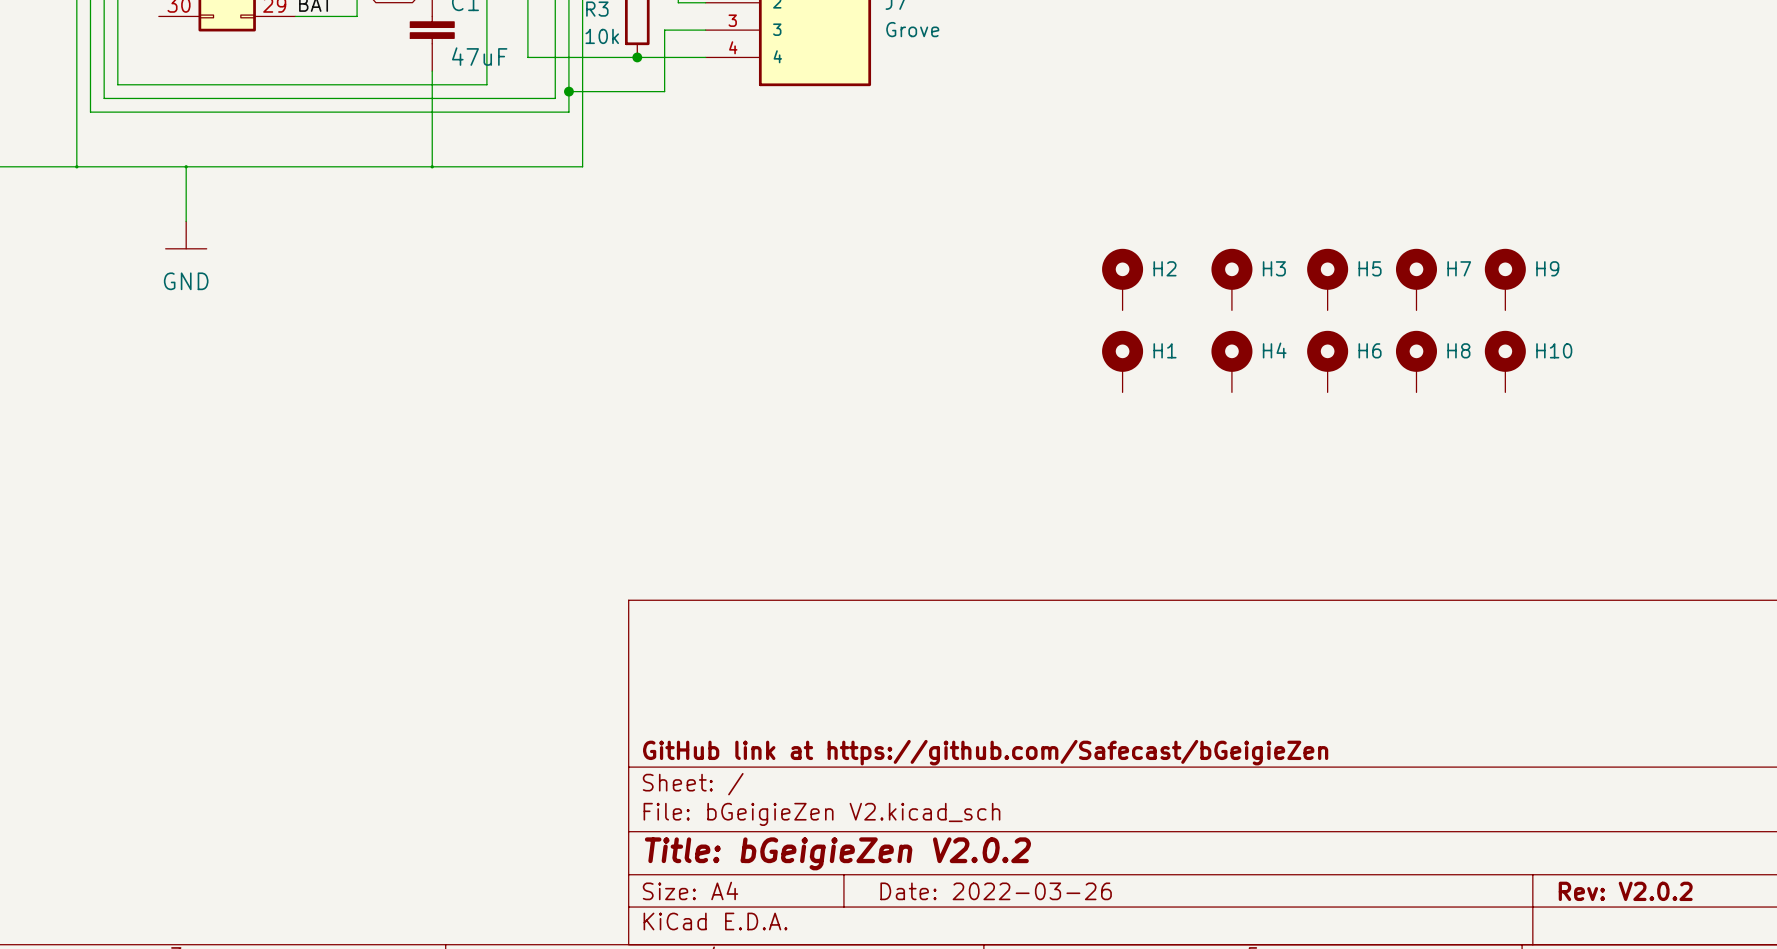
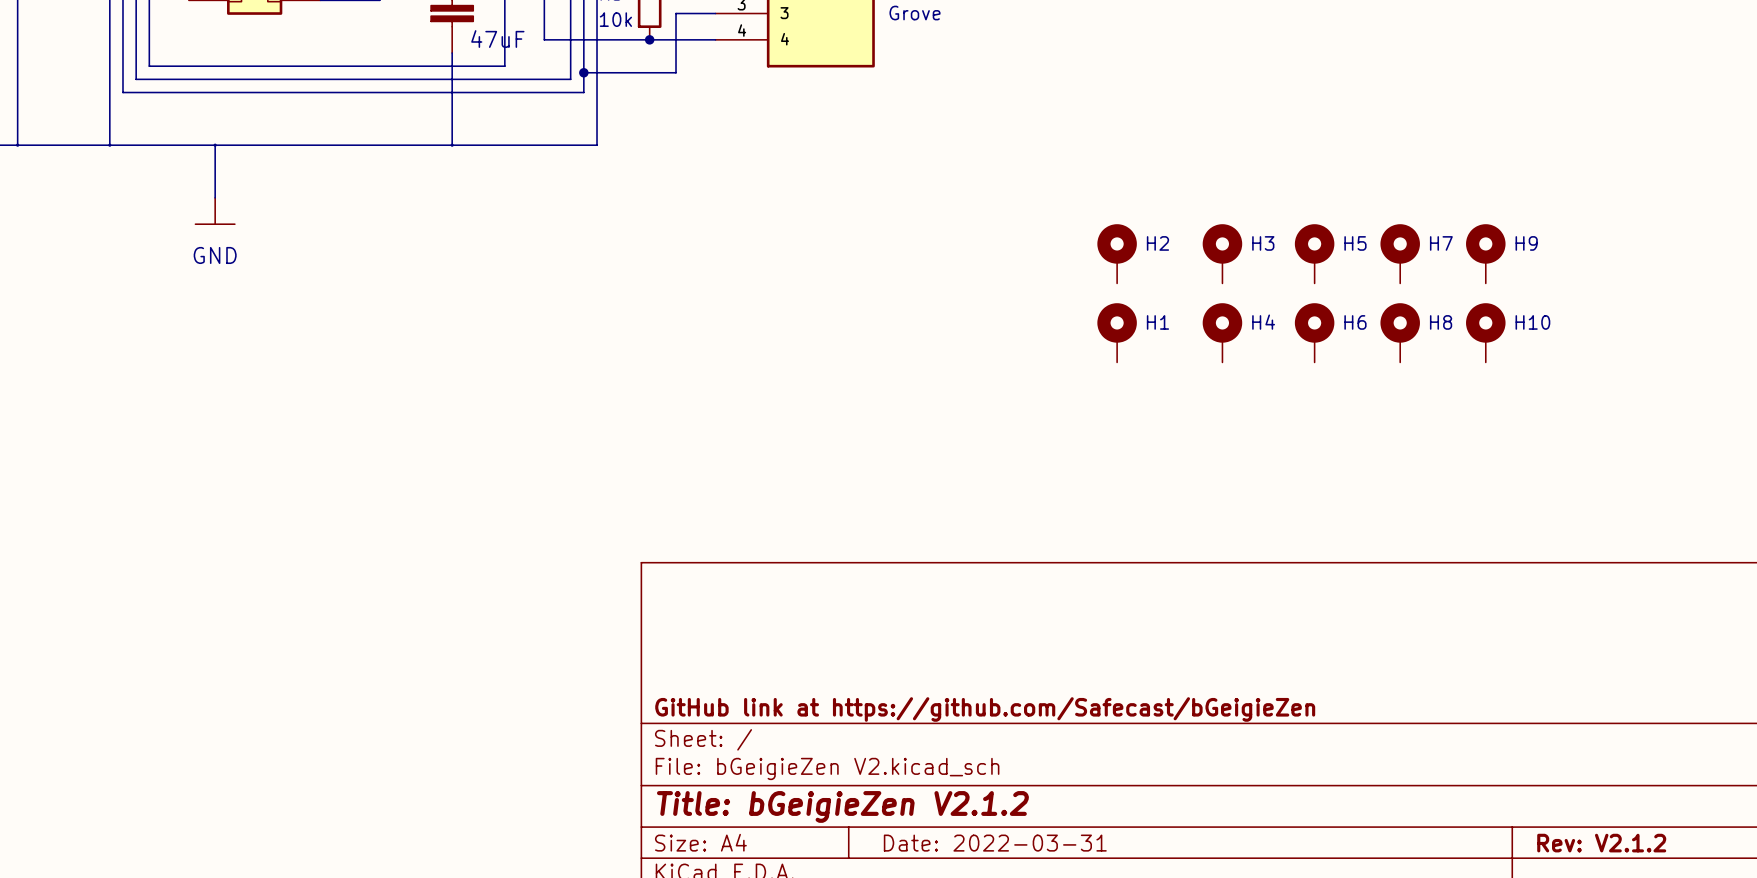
title block: Title: bGeigieZen V2.0.2 (837, 853) -> Title: bGeigieZen V2.1.2 (842, 806)
title block: Date: 2022-03-26 (996, 891) -> Date: 2022-03-31 (995, 843)
title block: Rev: V2.0.2 (1625, 891) -> Rev: V2.1.2 (1601, 843)

